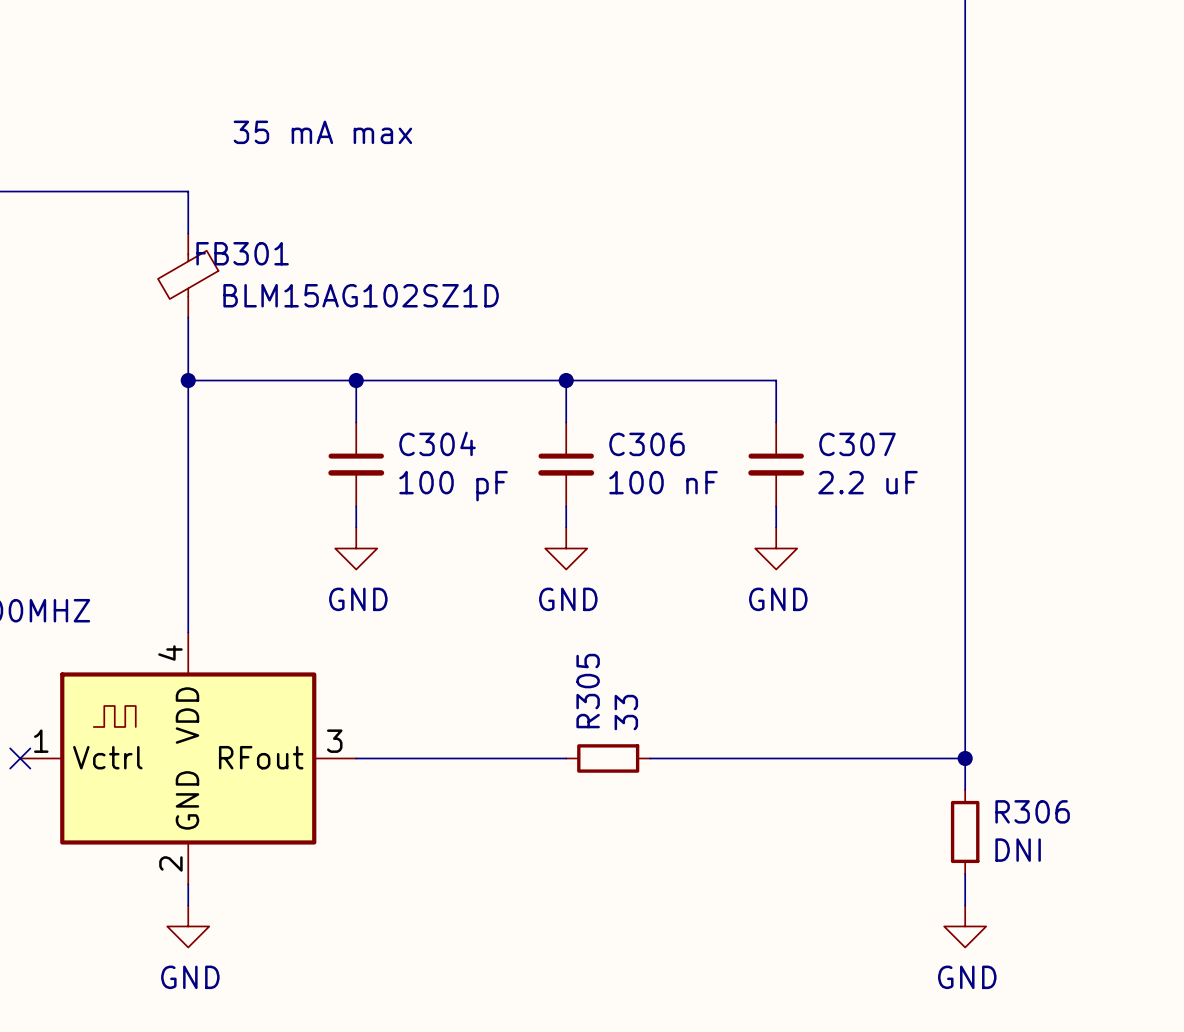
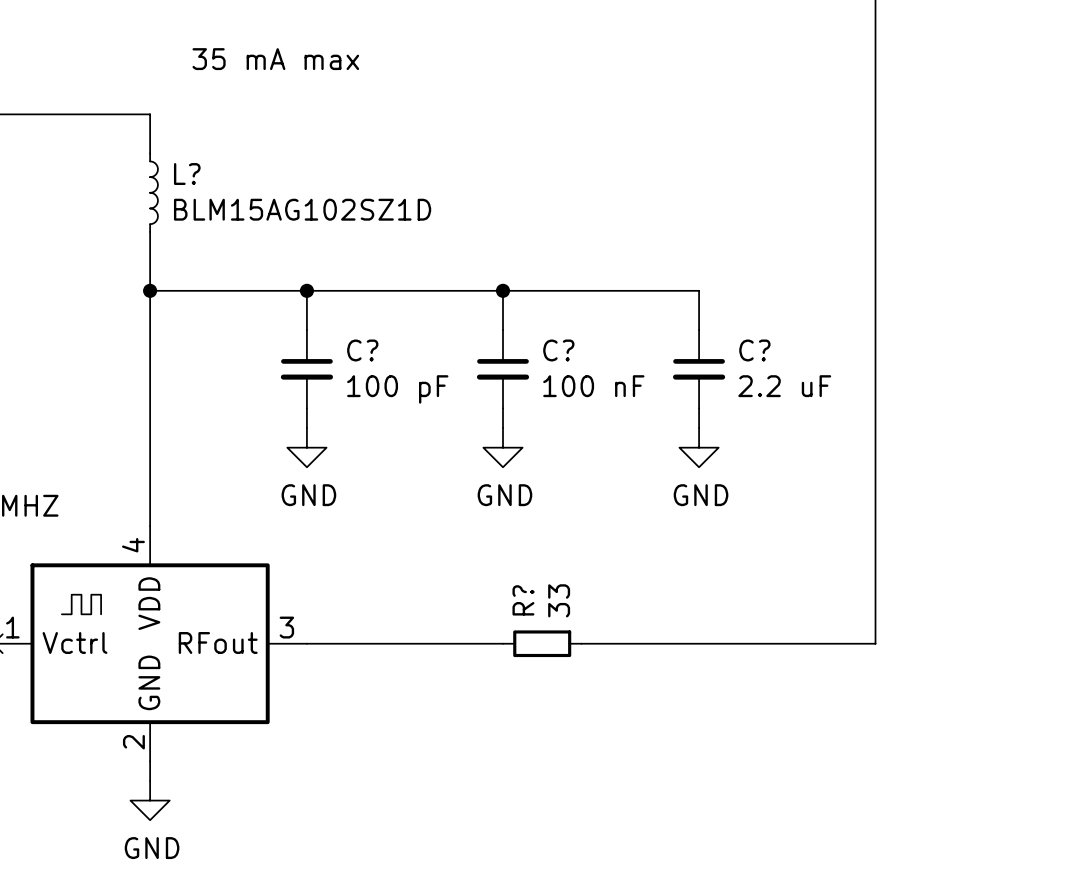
FB301: BLM15AG102SZ1D (188, 275) -> none
L?: none -> BLM15AG102SZ1D (154, 192)
C304 name: C304 (437, 443) -> C? (362, 350)
C306 name: C306 (647, 444) -> C? (558, 350)
C307 name: C307 (857, 444) -> C? (754, 350)
R305 name: R305 (588, 691) -> R? (523, 600)
wire: (965, 758) (965, 789) -> none
junction: (965, 758) -> none
R306: DNI (965, 831) -> none
wire: (965, 873) (965, 905) -> none
power symbol: GND (965, 926) -> none

